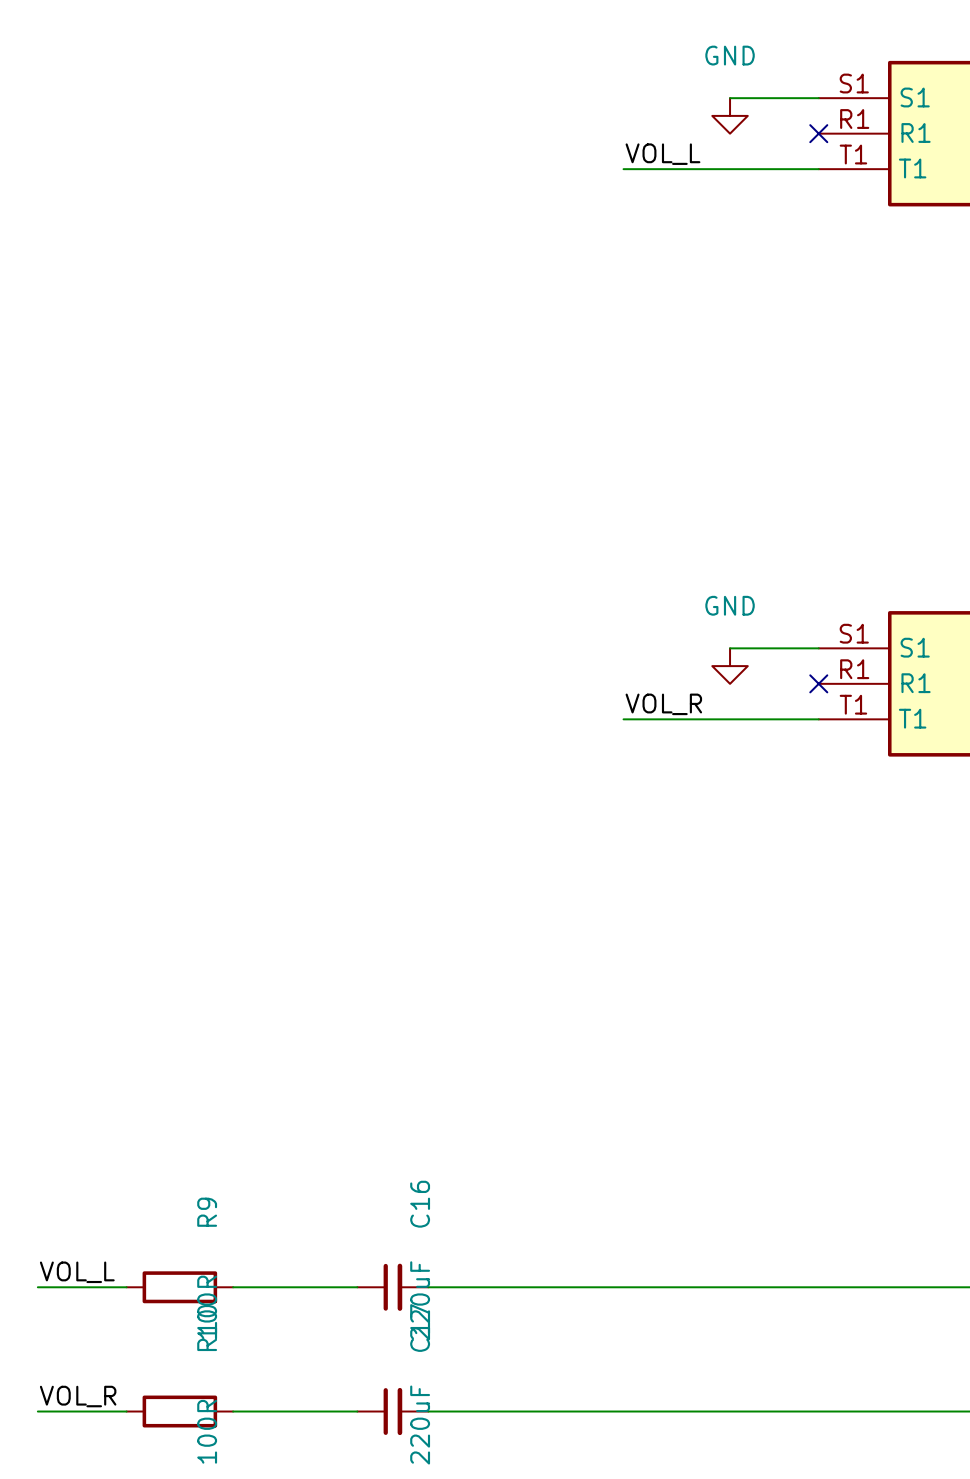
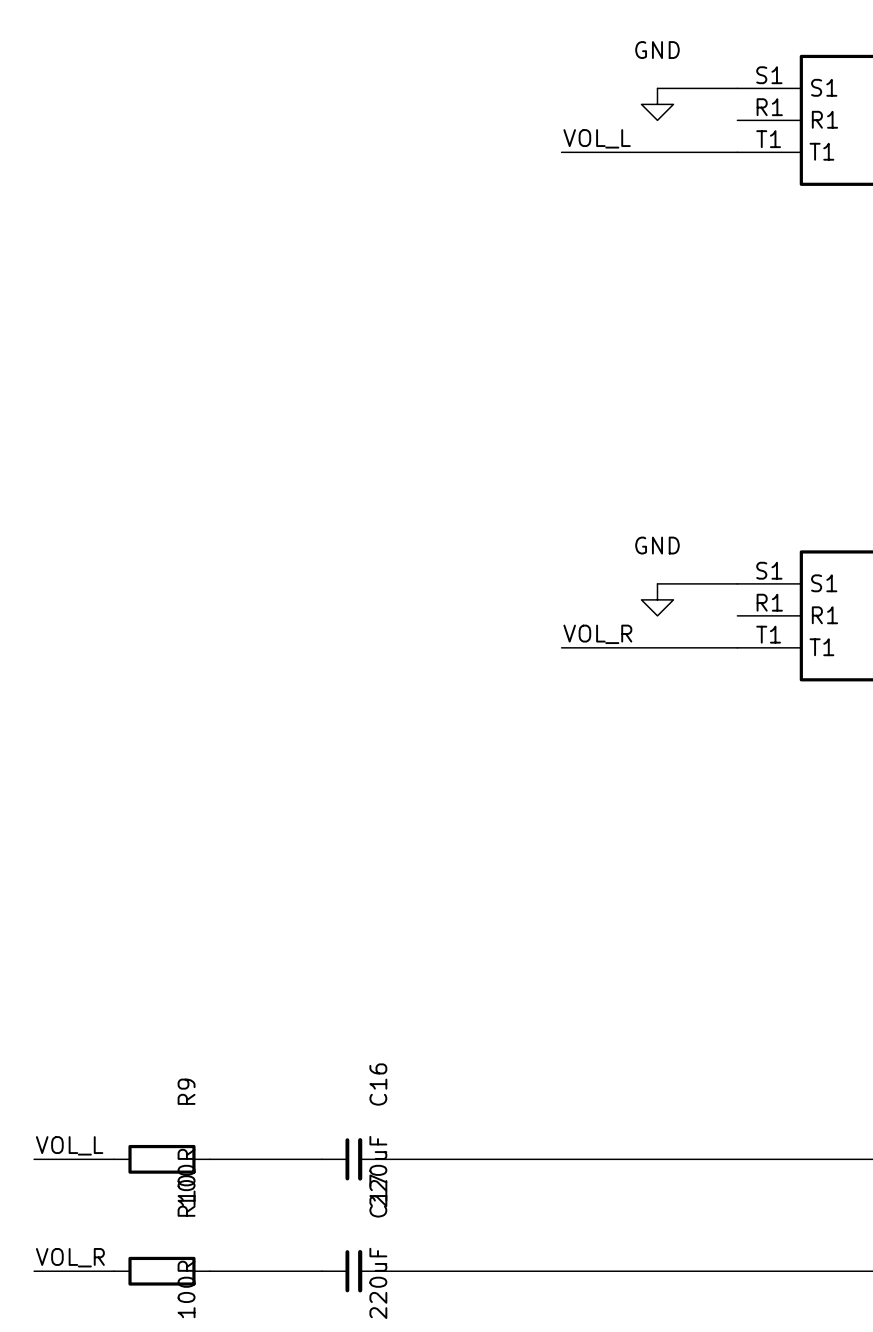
no-connect mark: (818, 133) -> none
no-connect mark: (818, 683) -> none

